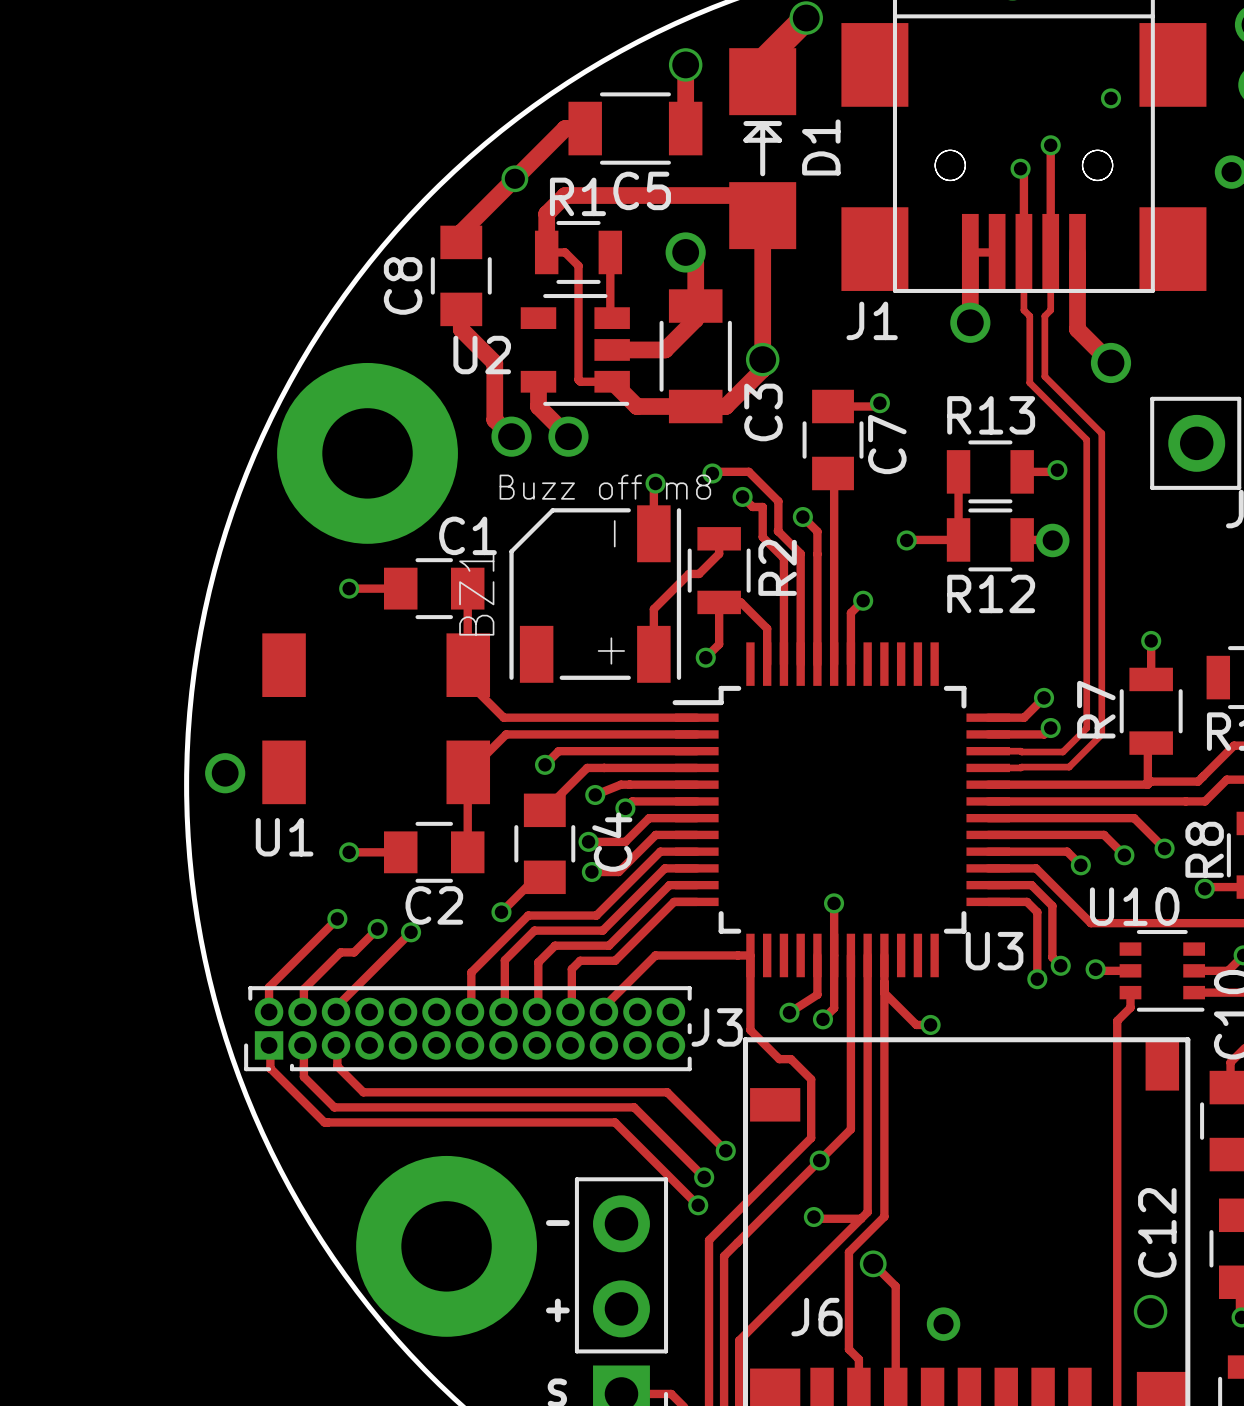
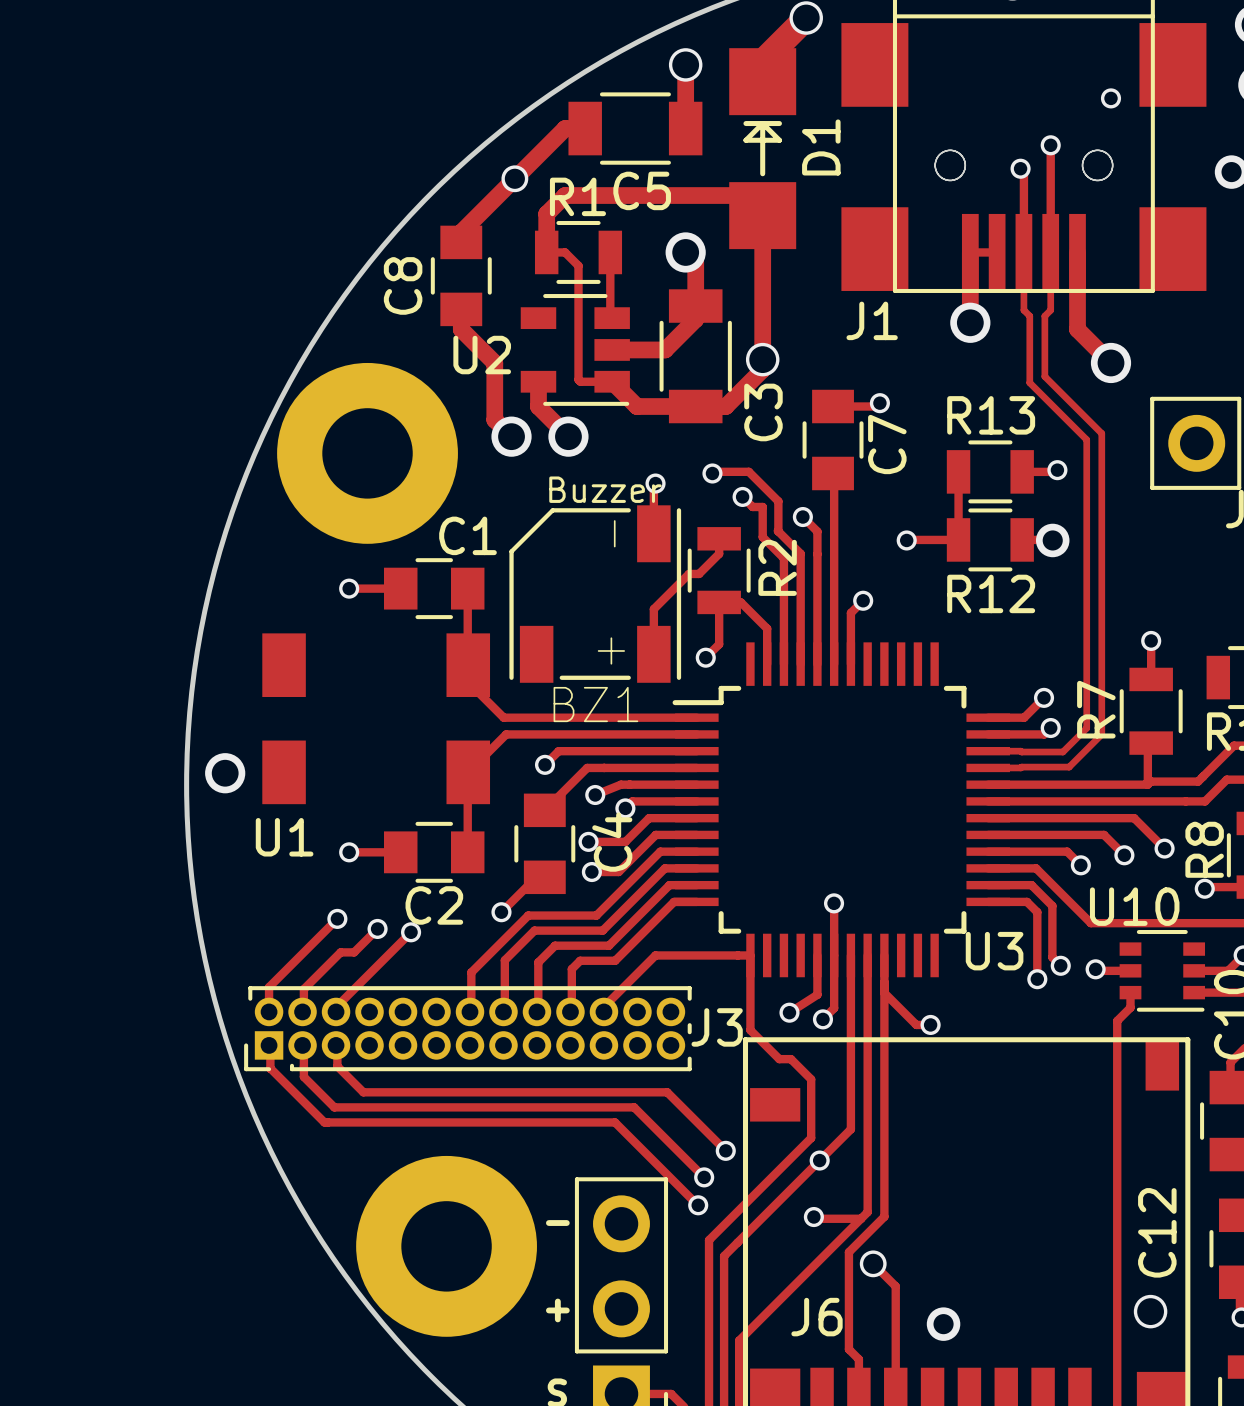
BZ1 value: Buzz off m8 (605, 487) -> Buzzer (605, 489)
BZ1 name rotation: 0° (476, 593) -> 90° clockwise (595, 704)
BZ1 name position: BZ1 (476, 593) -> BZ1 (595, 704)

